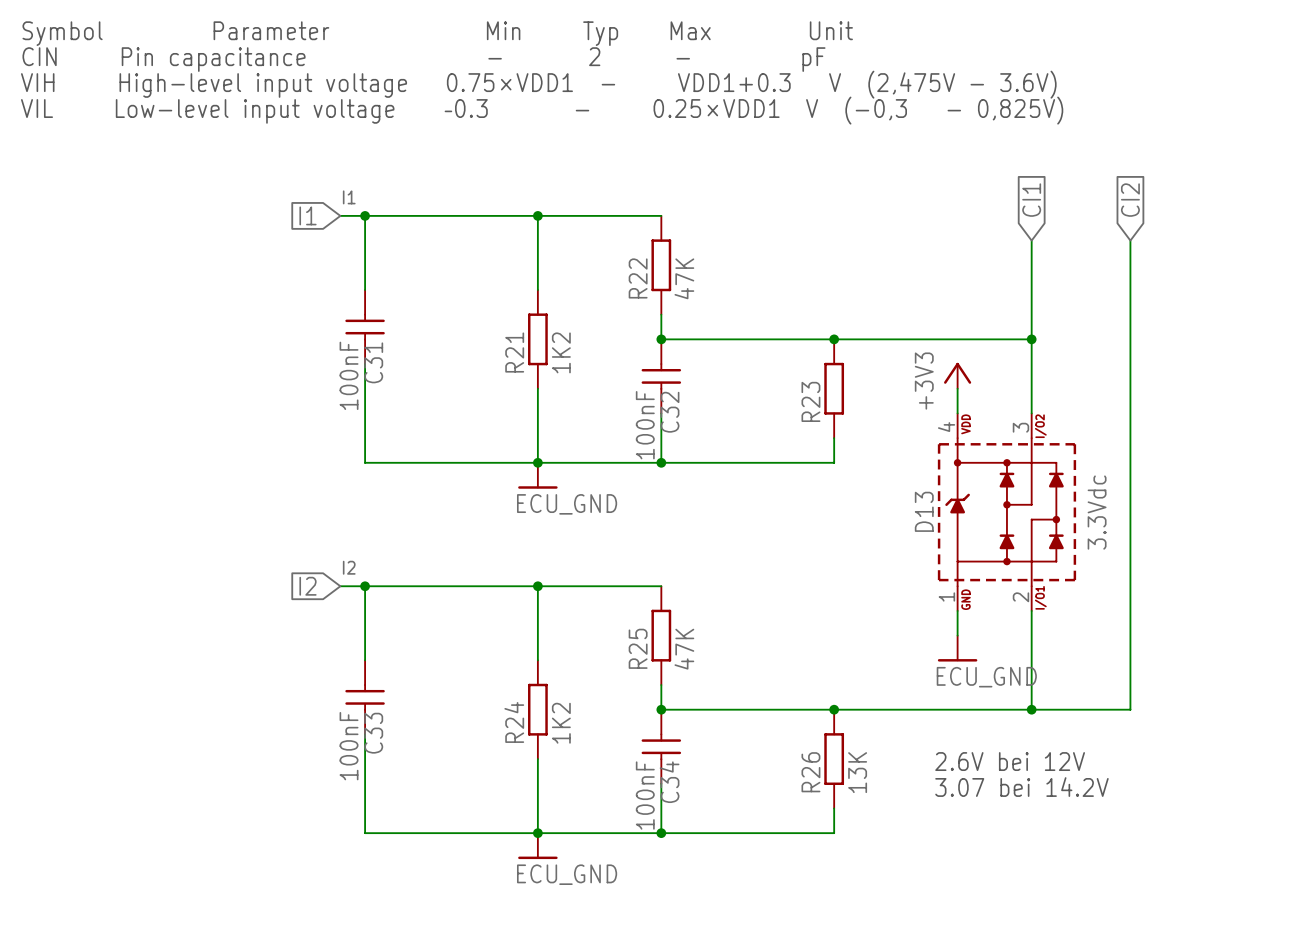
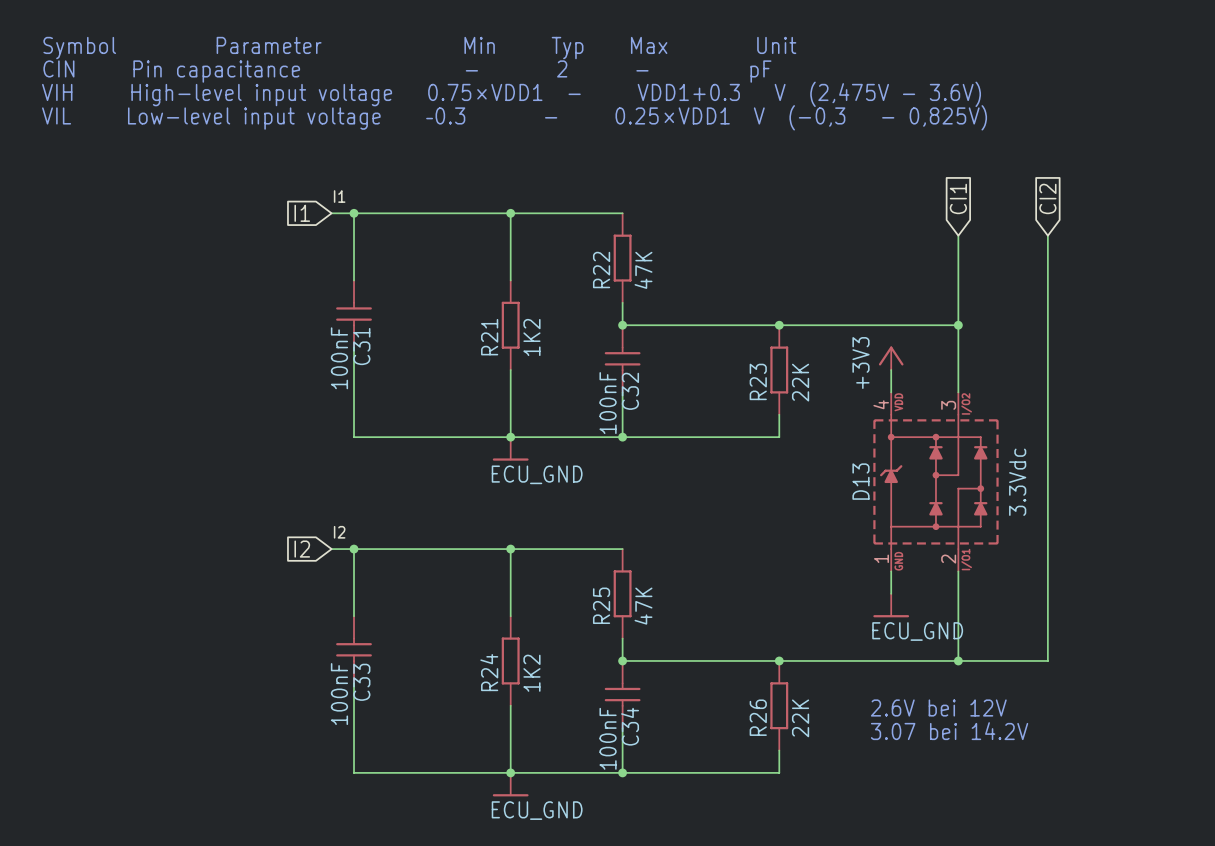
R23 value: none -> 22K (800, 382)
R26 value: 13K (857, 772) -> 22K (800, 718)

